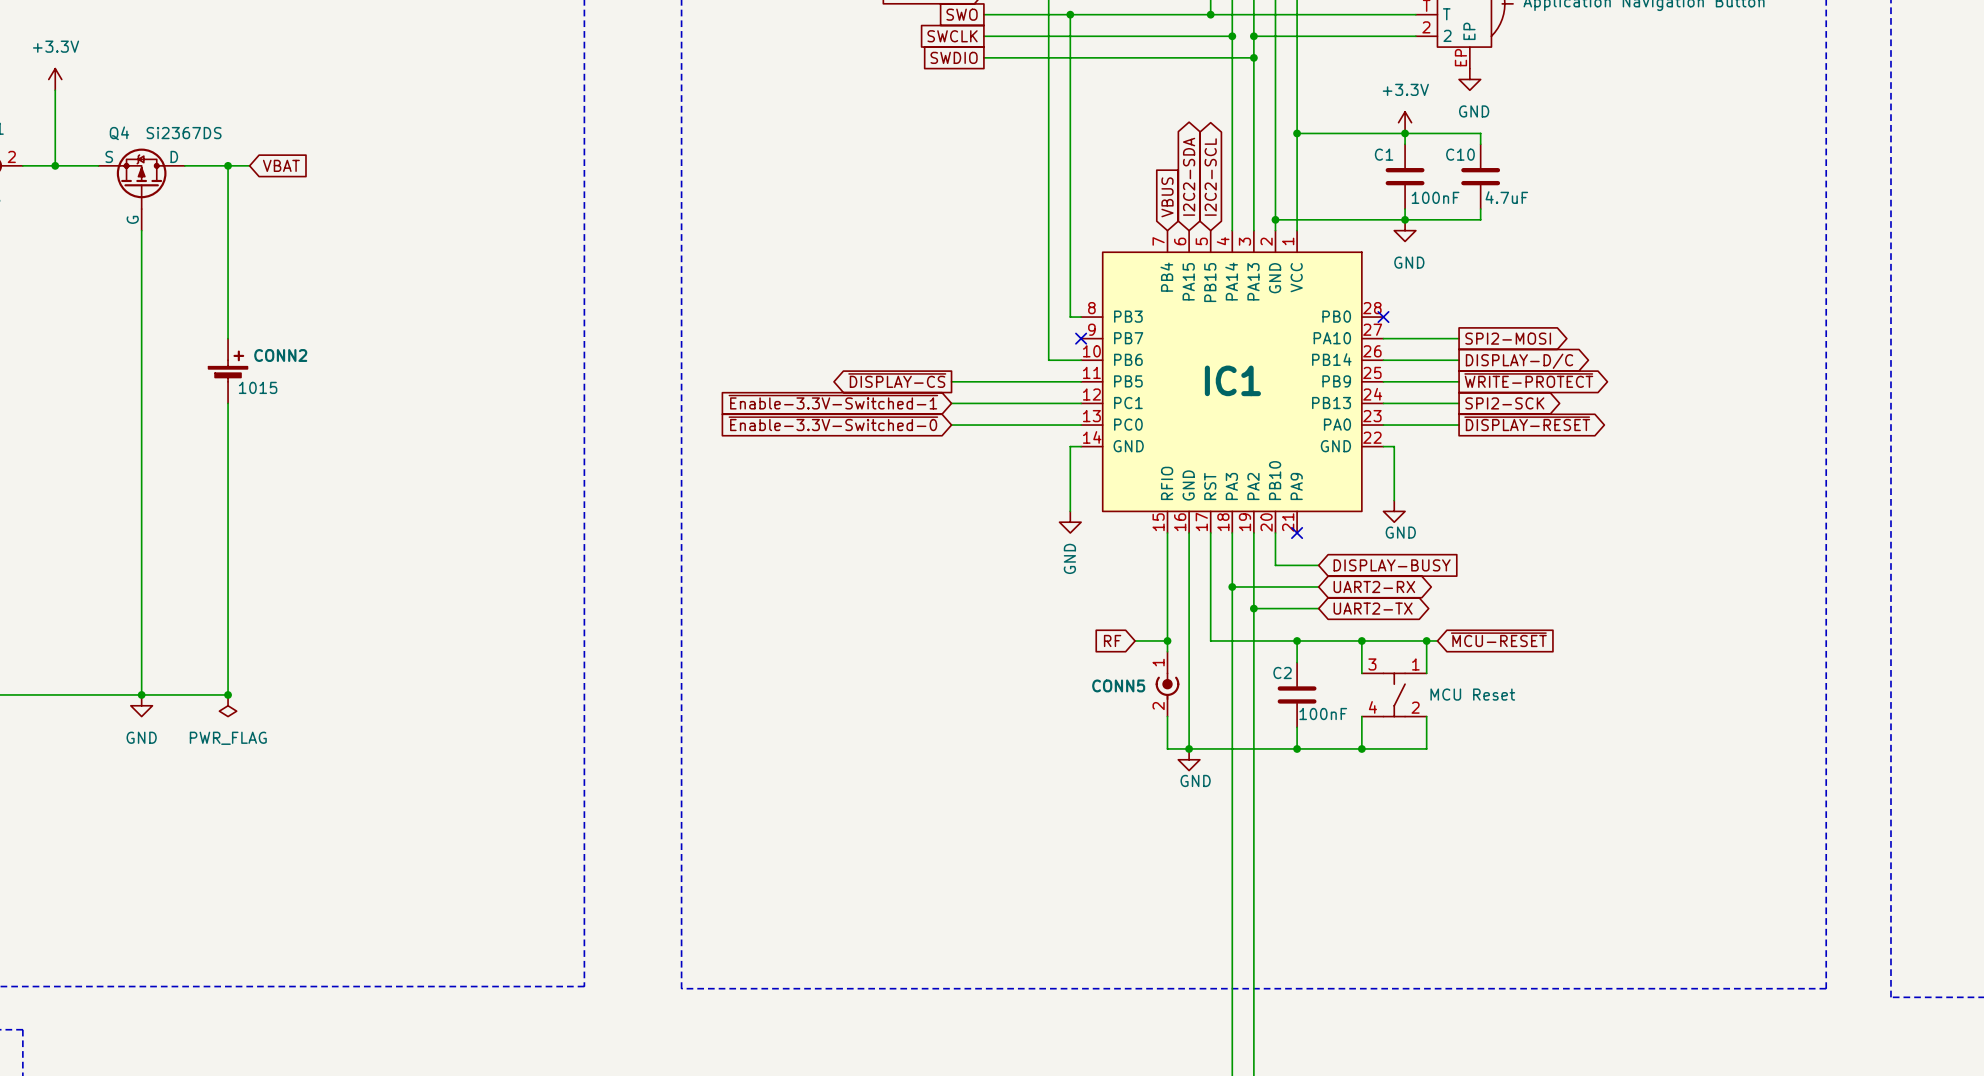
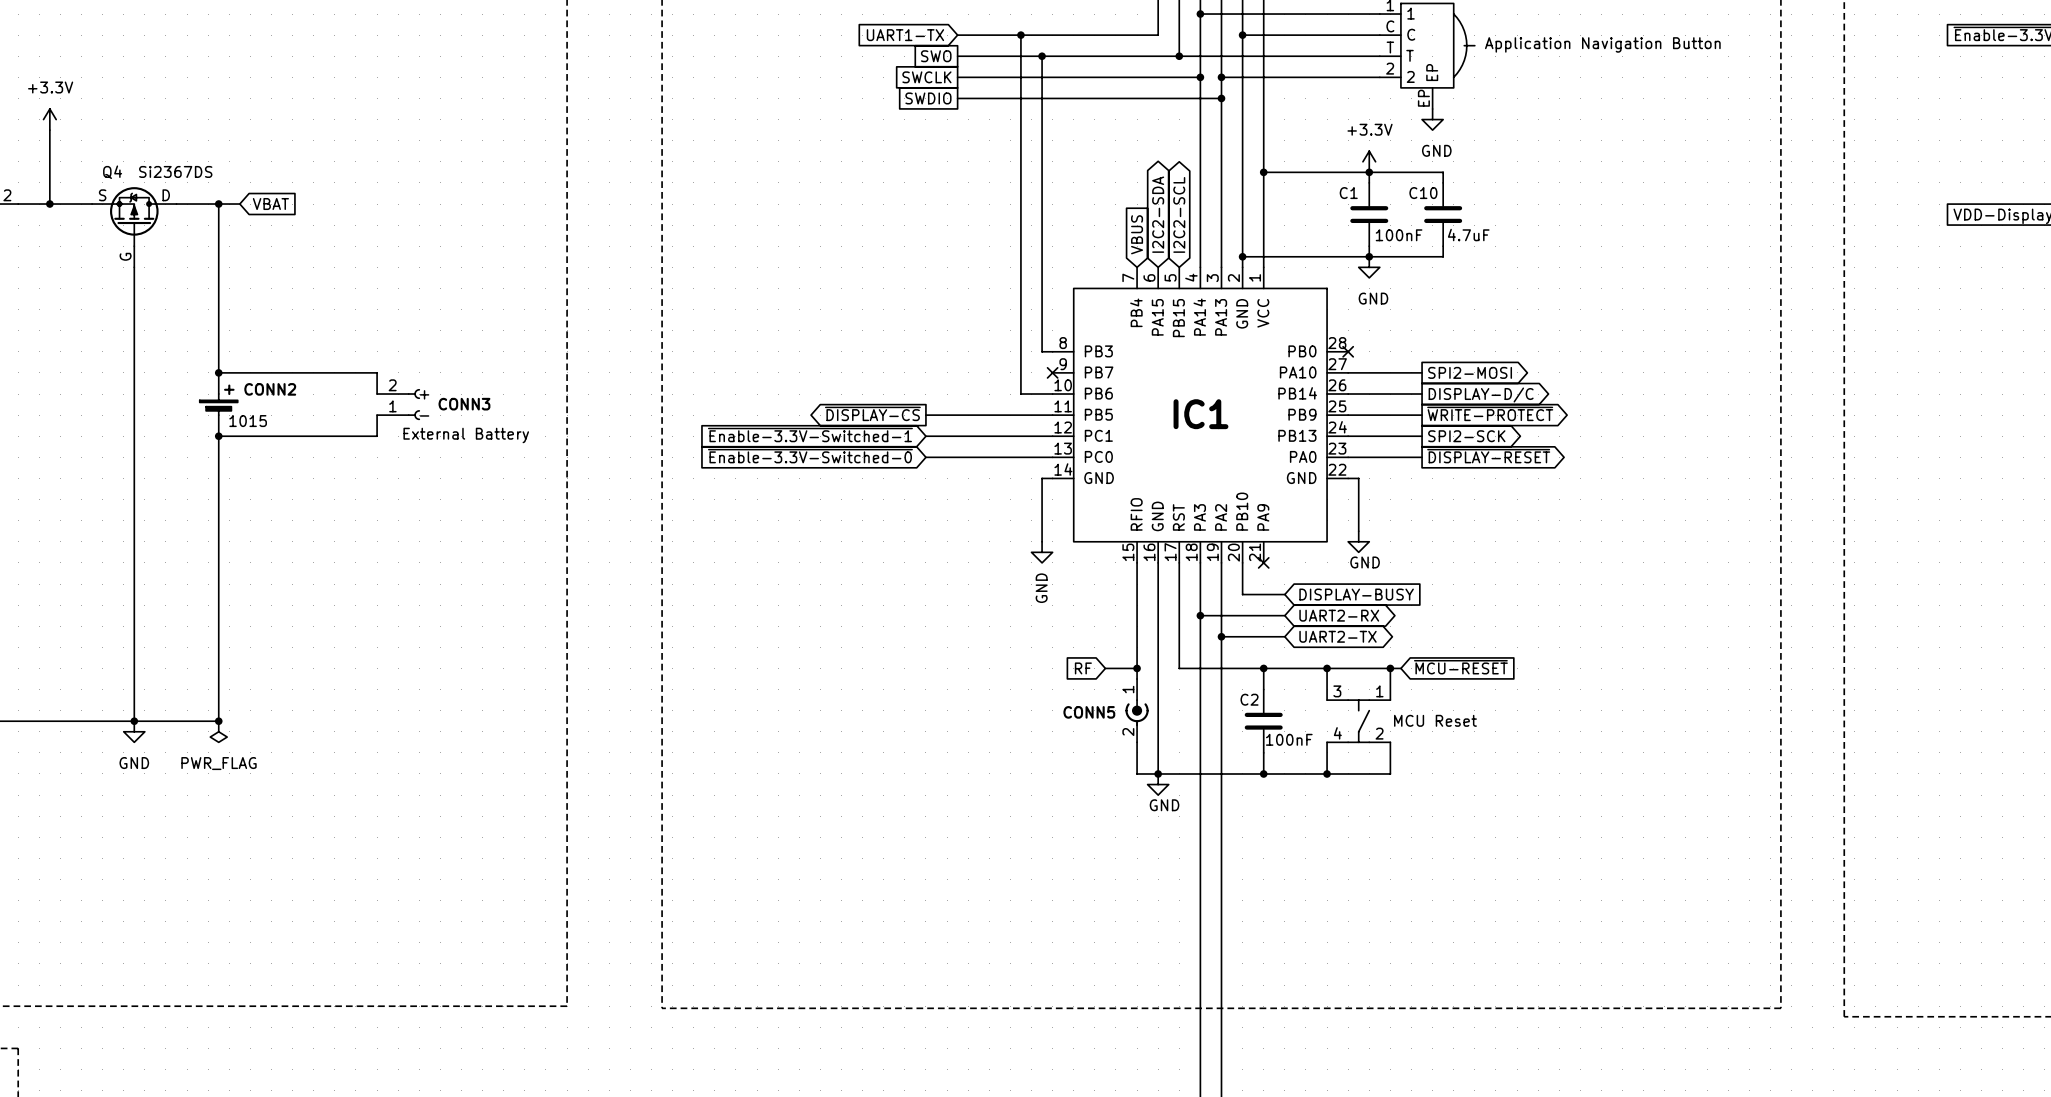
wire: none -> (218, 372) (377, 372) (377, 394)
junction: none -> (218, 372)
CONN3: none -> (398, 404)
wire: none -> (377, 415) (377, 436) (218, 436)
junction: none -> (218, 436)

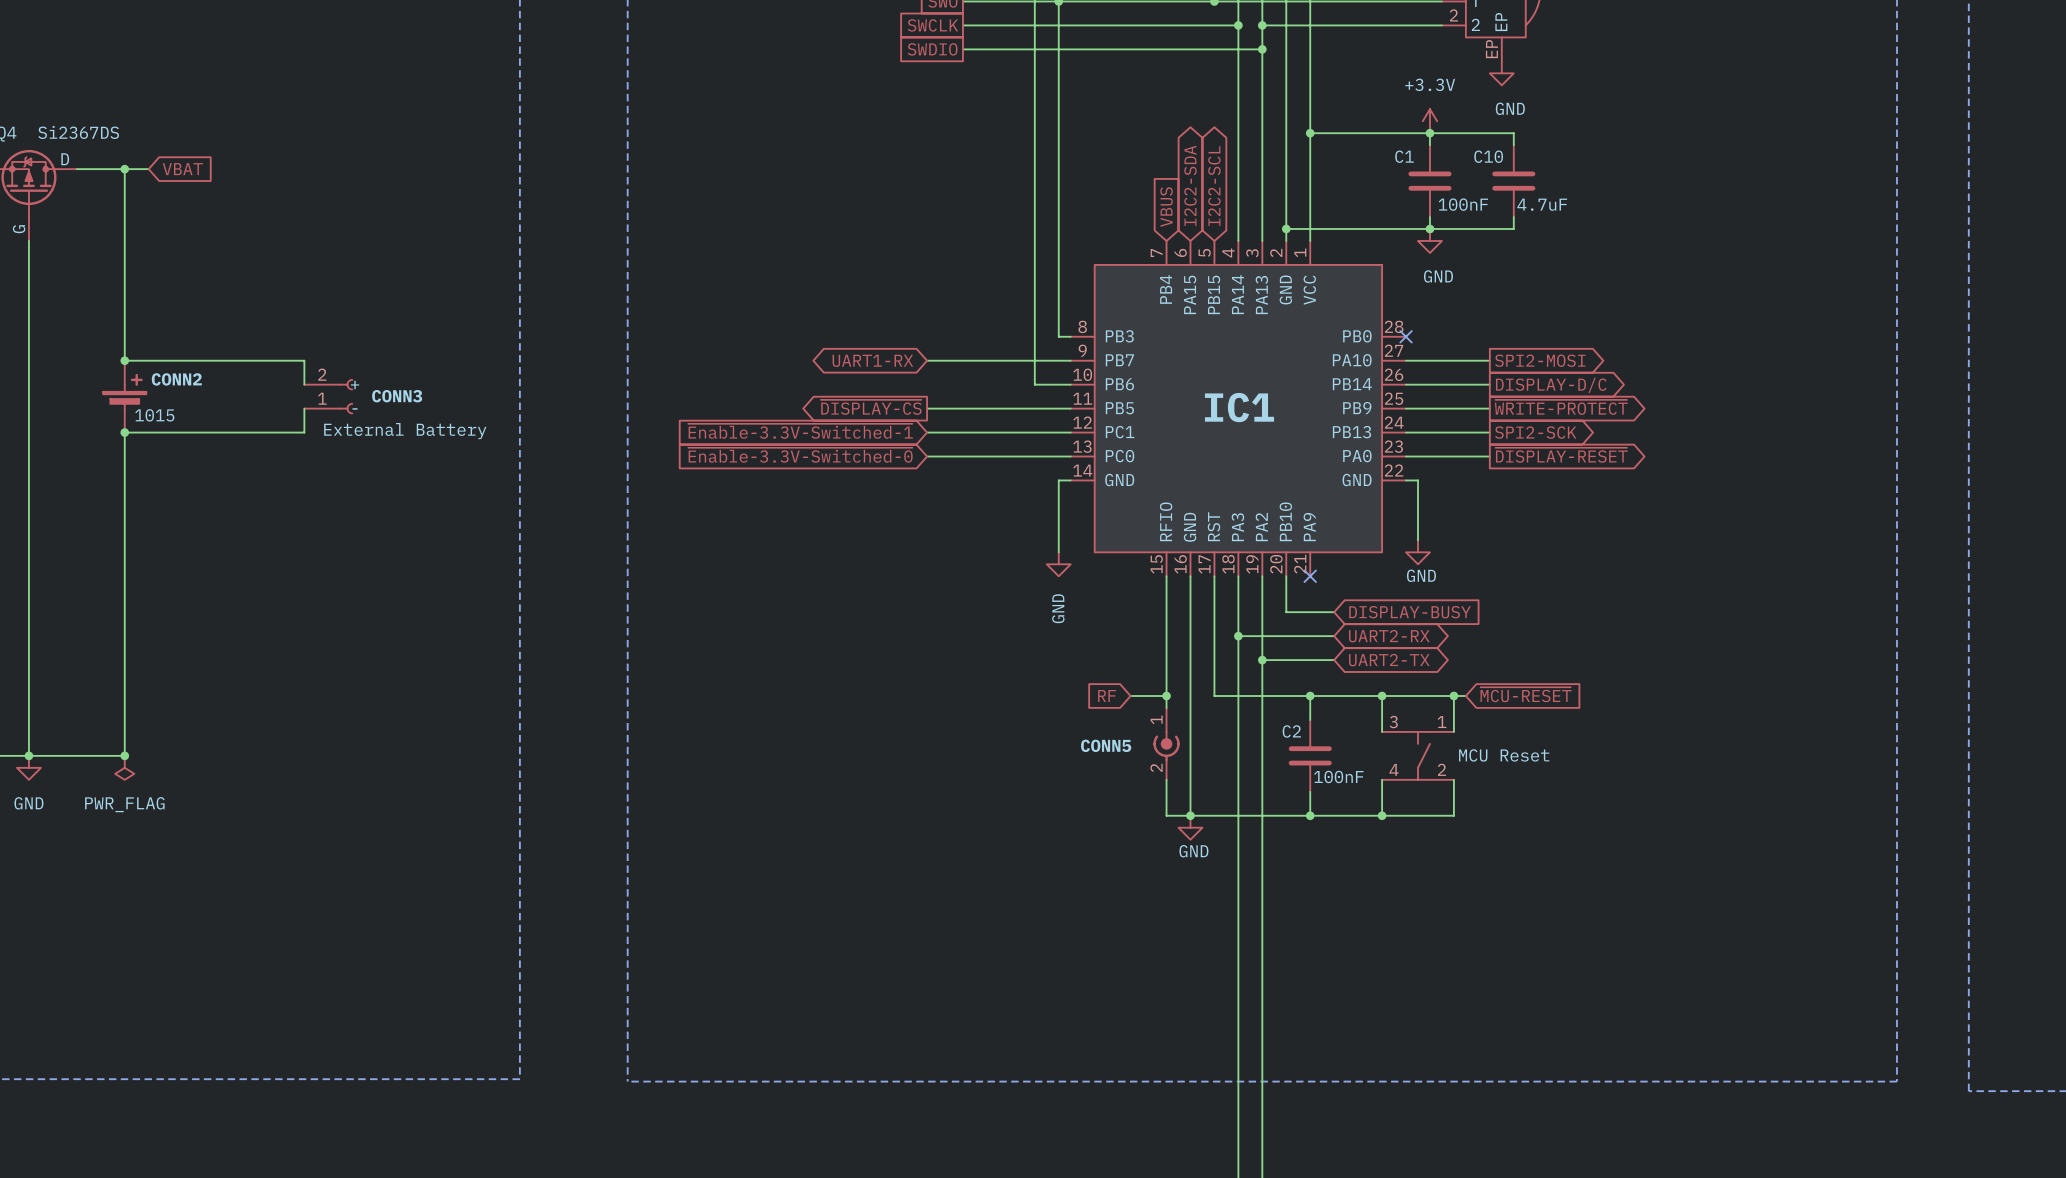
global label: none -> UART1-RX (872, 360)
wire: none -> (927, 360) (1070, 360)
no-connect mark: (1052, 372) -> none

